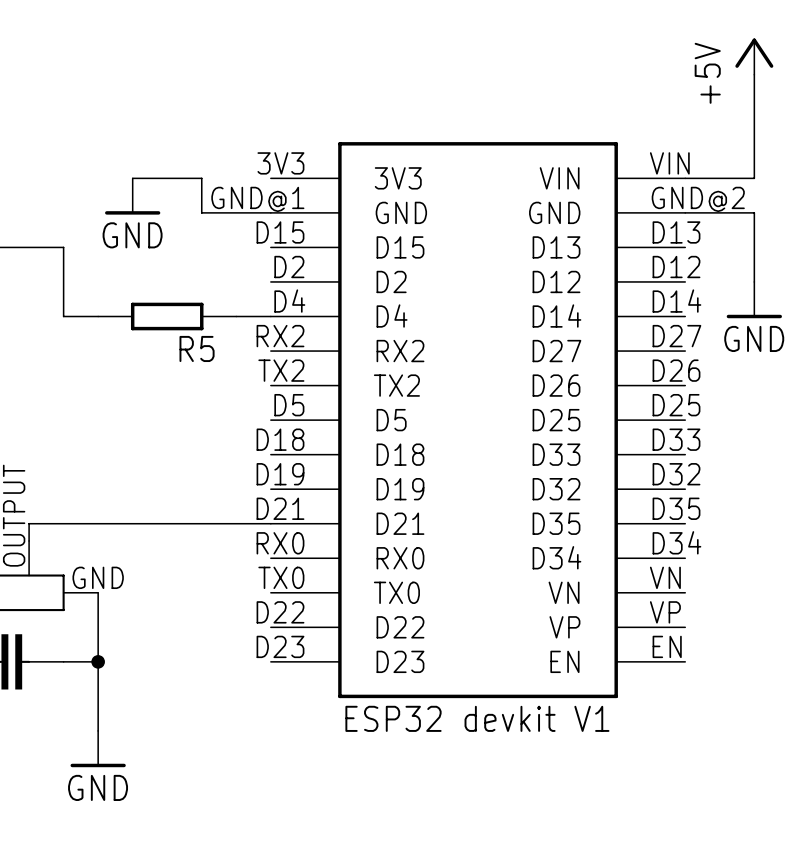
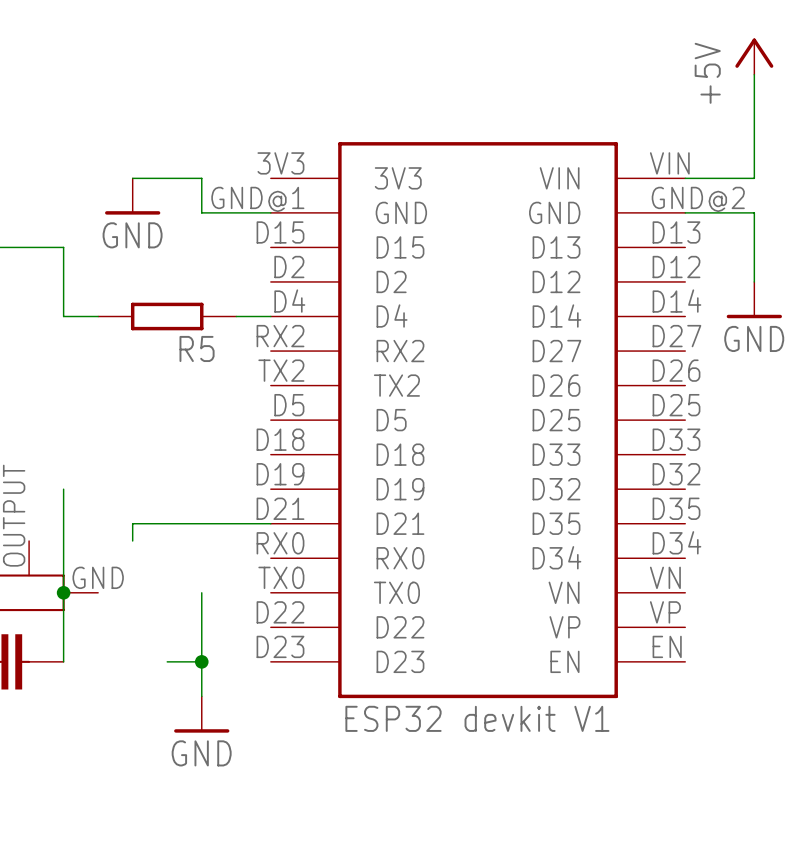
wire: (132, 523) (29, 523) (29, 540) -> (132, 523) (132, 540)
junction: none -> (63, 592)
wire: (98, 592) (98, 730) -> none
wire: none -> (201, 592) (201, 696)
wire: (63, 661) (98, 661) -> (63, 661) (63, 489)
junction: (98, 661) -> none
wire: none -> (167, 661) (201, 661)
junction: none -> (201, 661)
power symbol position: GND (98, 749) -> GND (201, 714)

